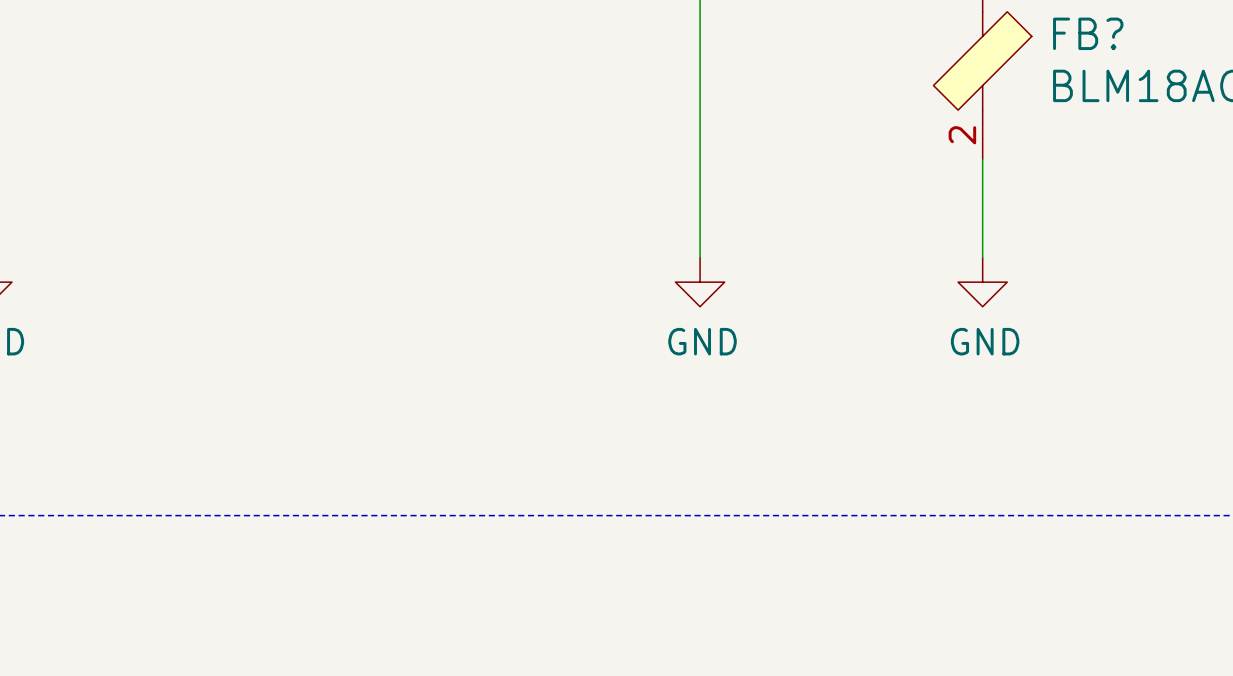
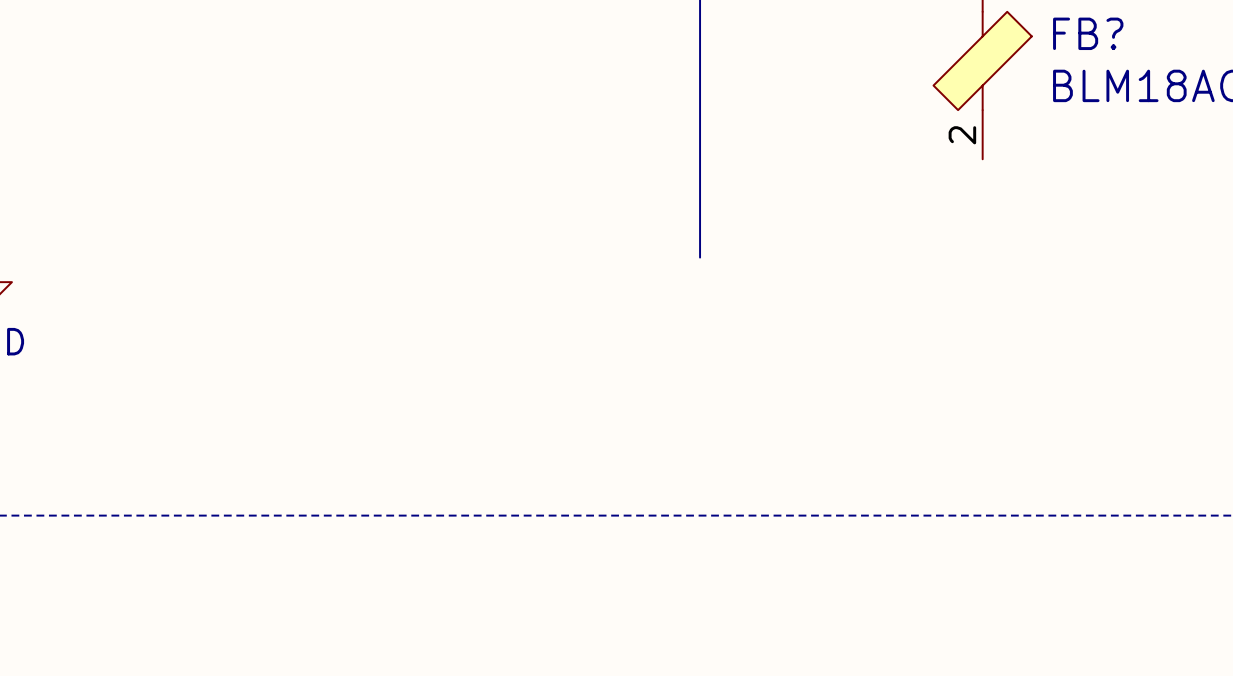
wire: (982, 159) (982, 257) -> none
power symbol: GND (700, 282) -> none
power symbol: GND (982, 282) -> none

